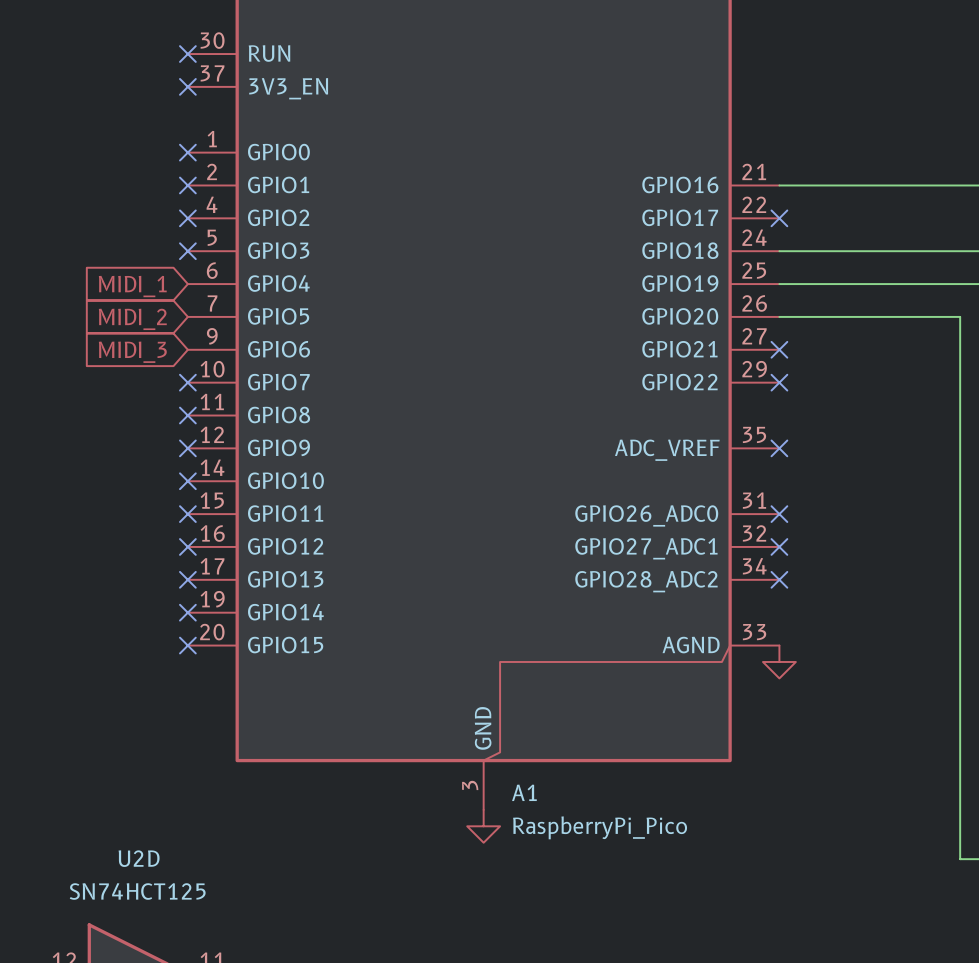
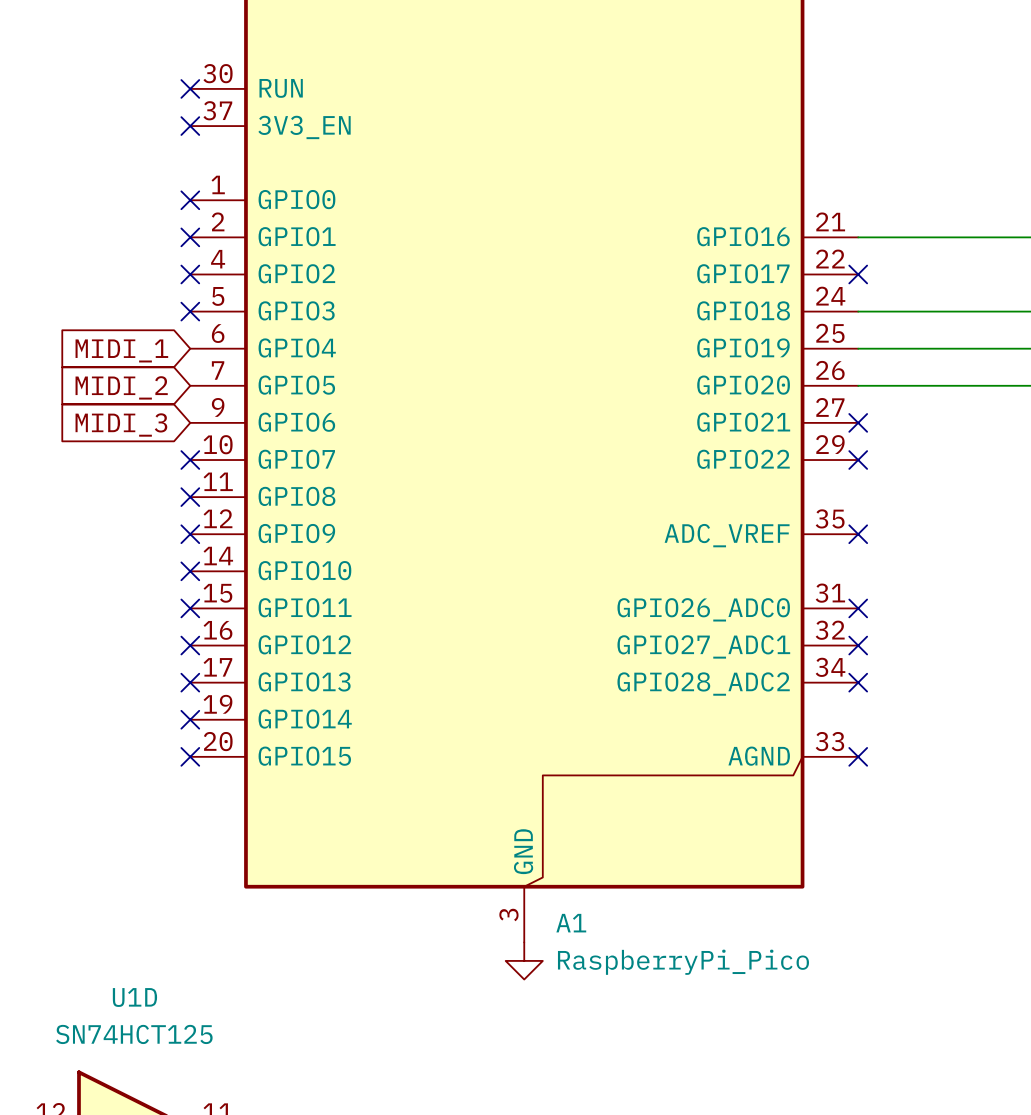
no-connect mark: none -> (858, 756)
power symbol: (779, 661) -> none
U2D name: U2D (139, 858) -> U1D (134, 997)

